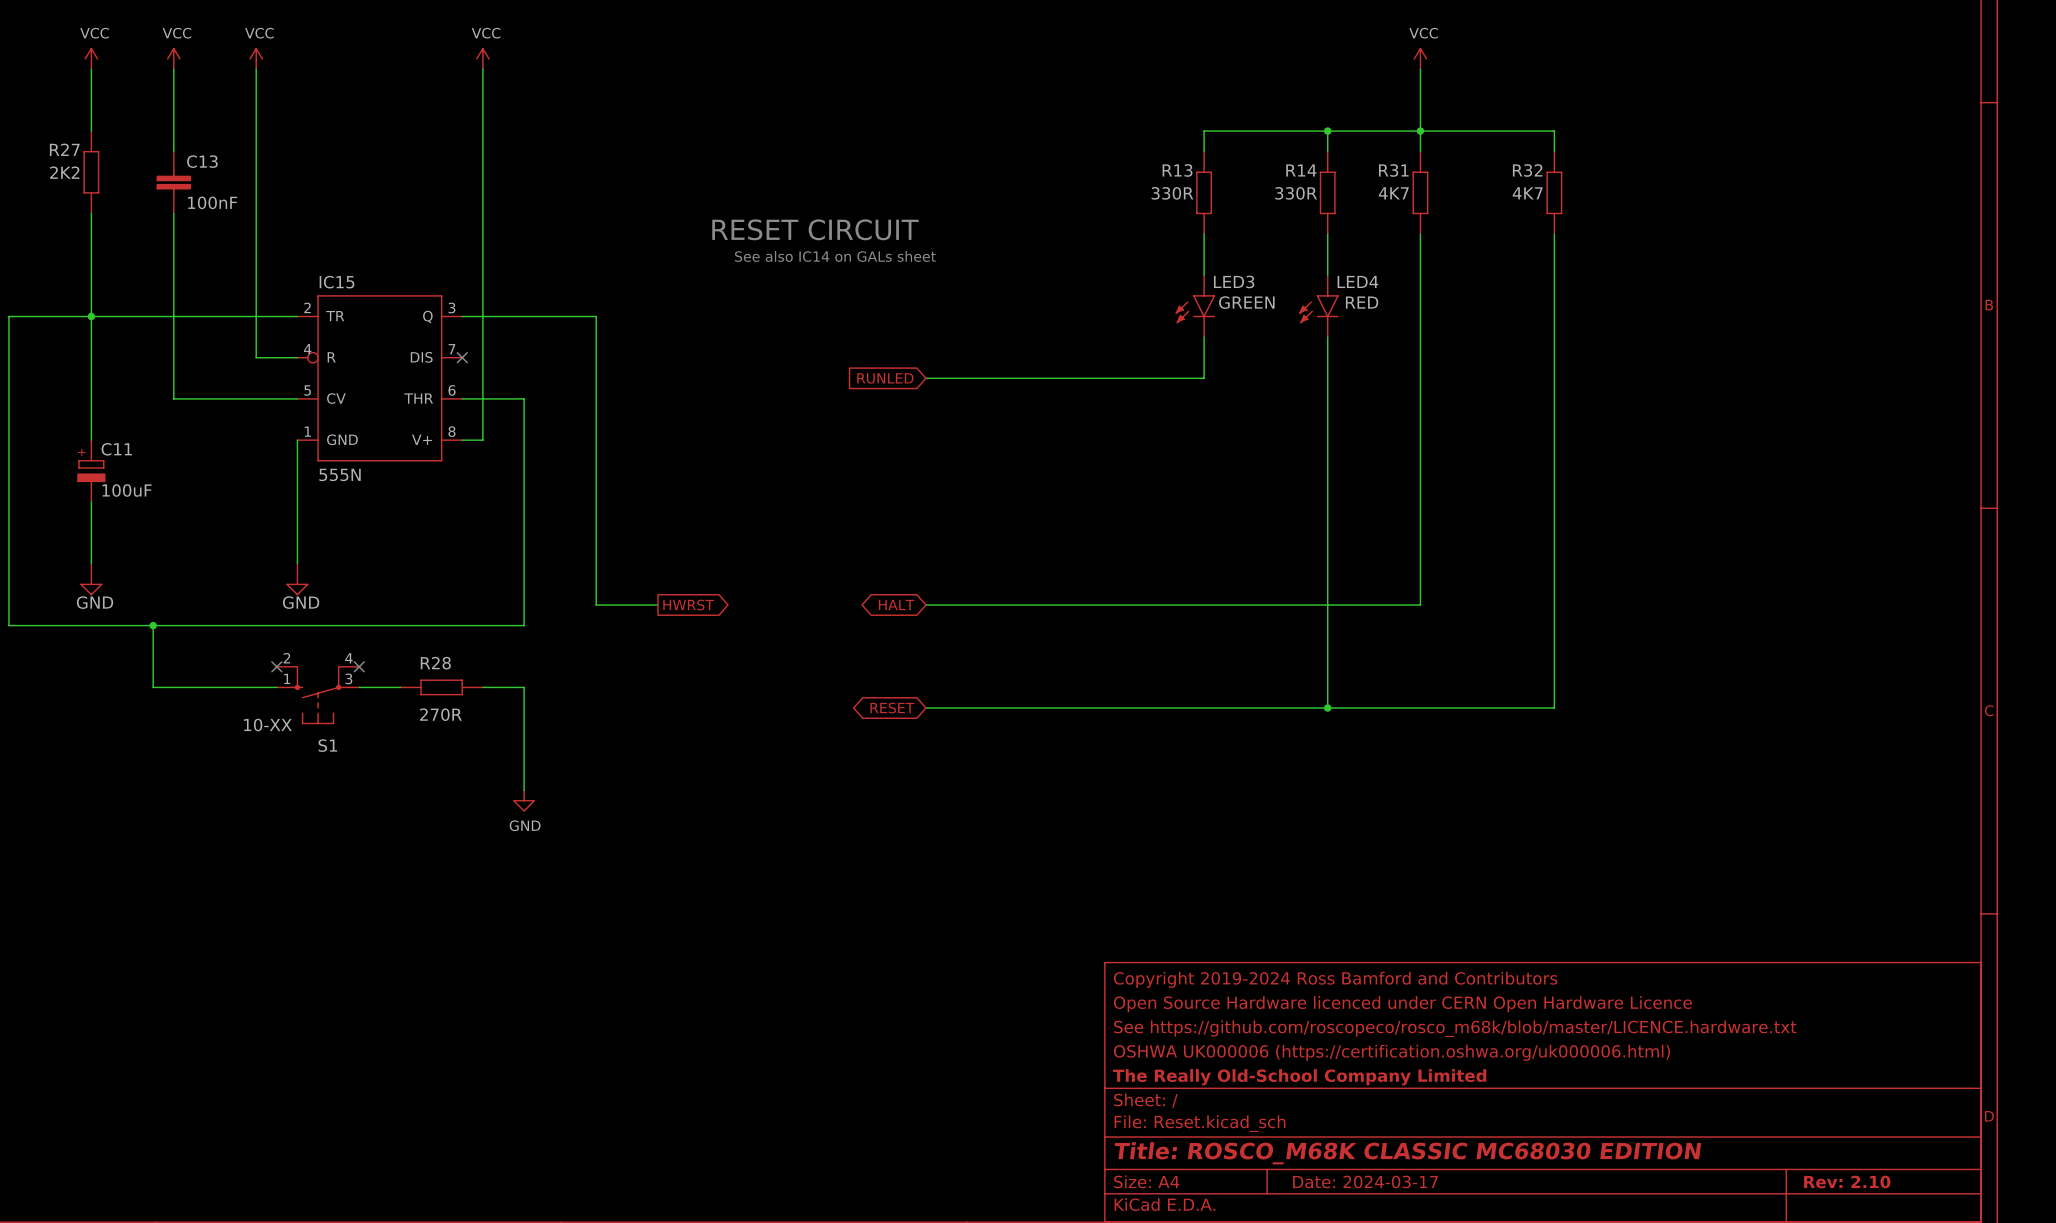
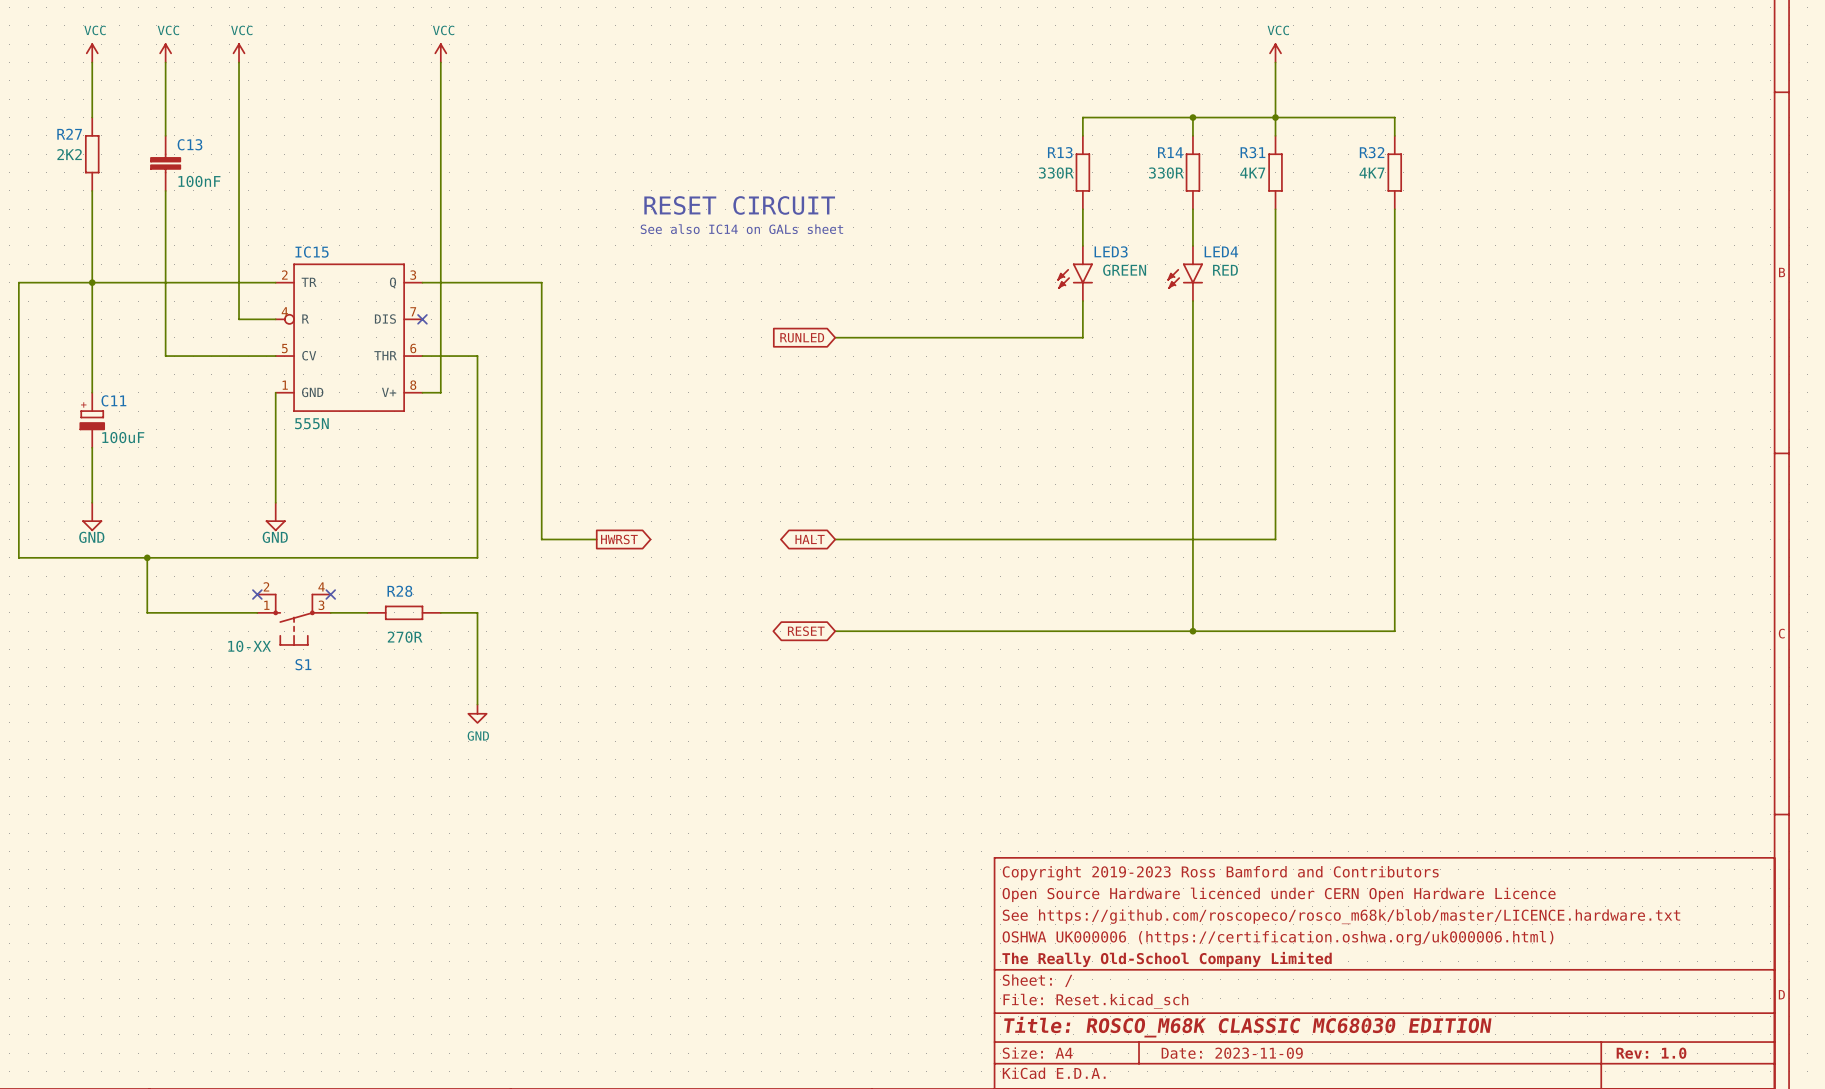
title block: Copyright 2019-2024 Ross Bamford and Contributors (1335, 979) -> Copyright 2019-2023 Ross Bamford and Contributors (1220, 873)
title block: Date: 2024-03-17 (1365, 1181) -> Date: 2023-11-09 (1232, 1053)
title block: Rev: 2.10 (1847, 1181) -> Rev: 1.0 (1651, 1053)

